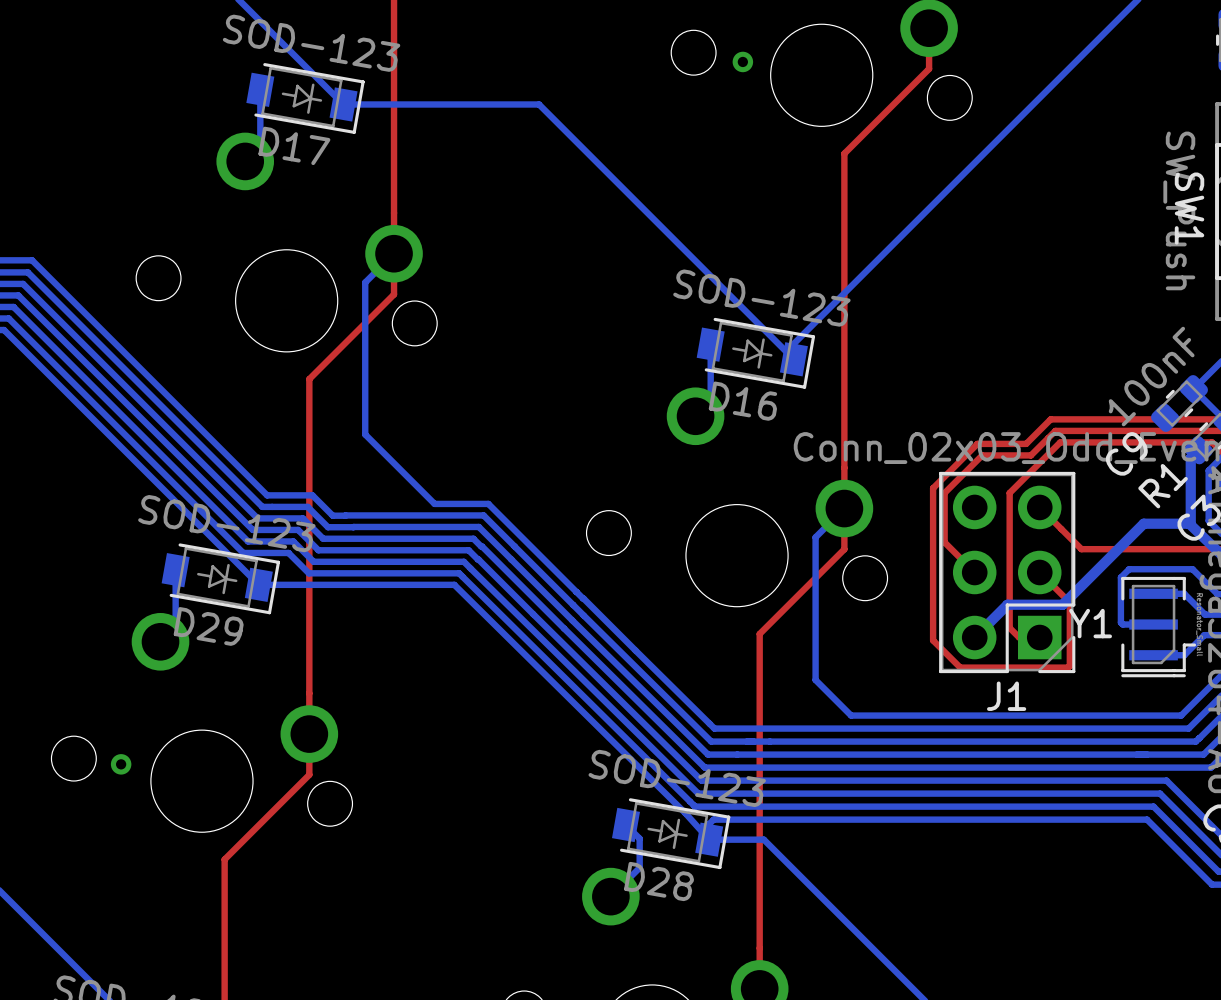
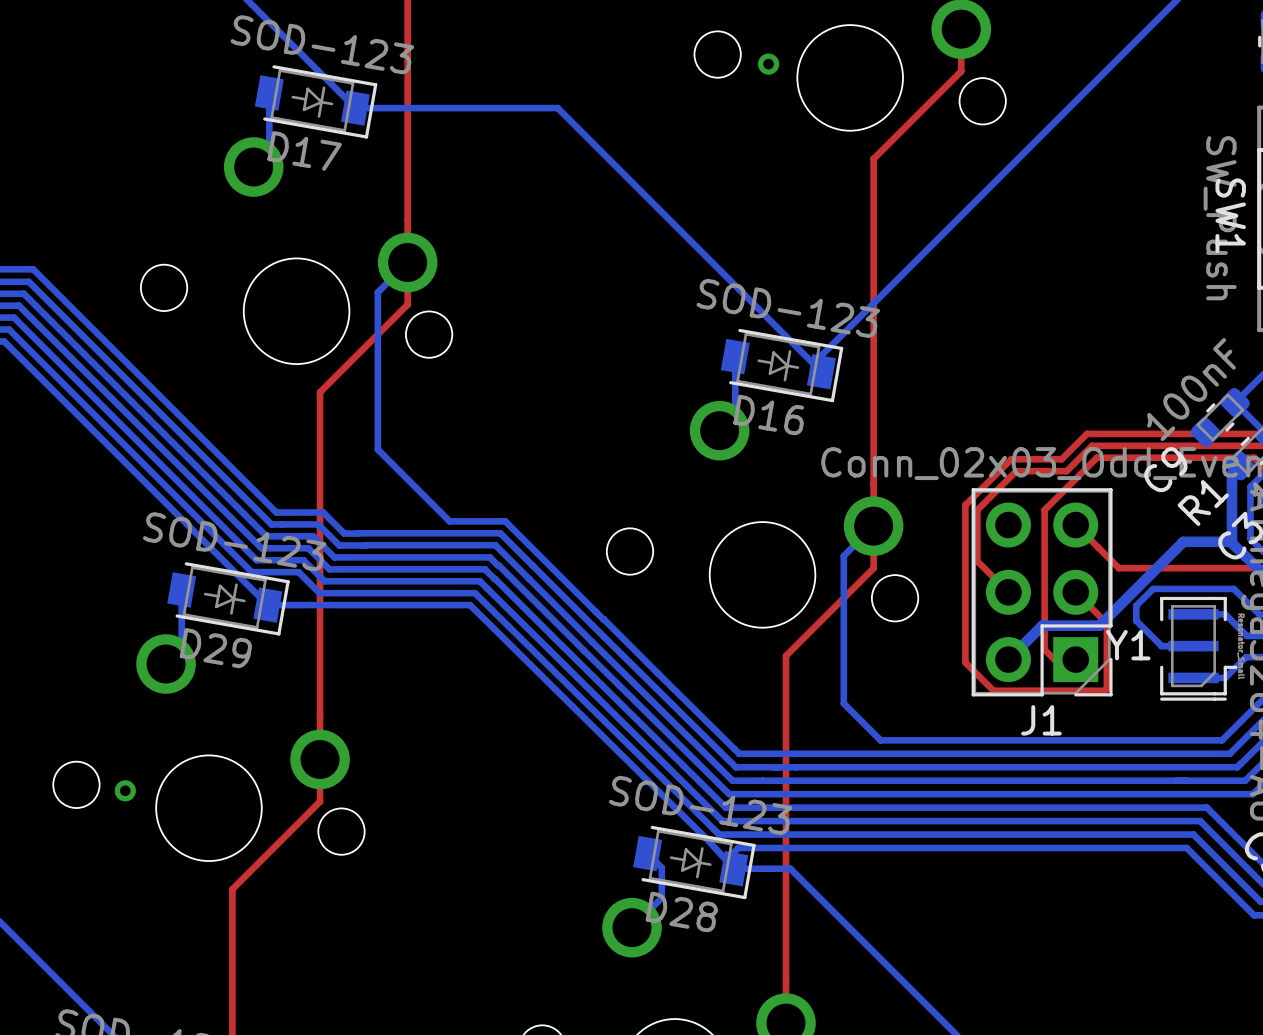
bottom track: (1129, 569) (1120, 577) (1120, 622) -> (1168, 588) (1153, 588) (1136, 605) (1136, 620) (1159, 644)

